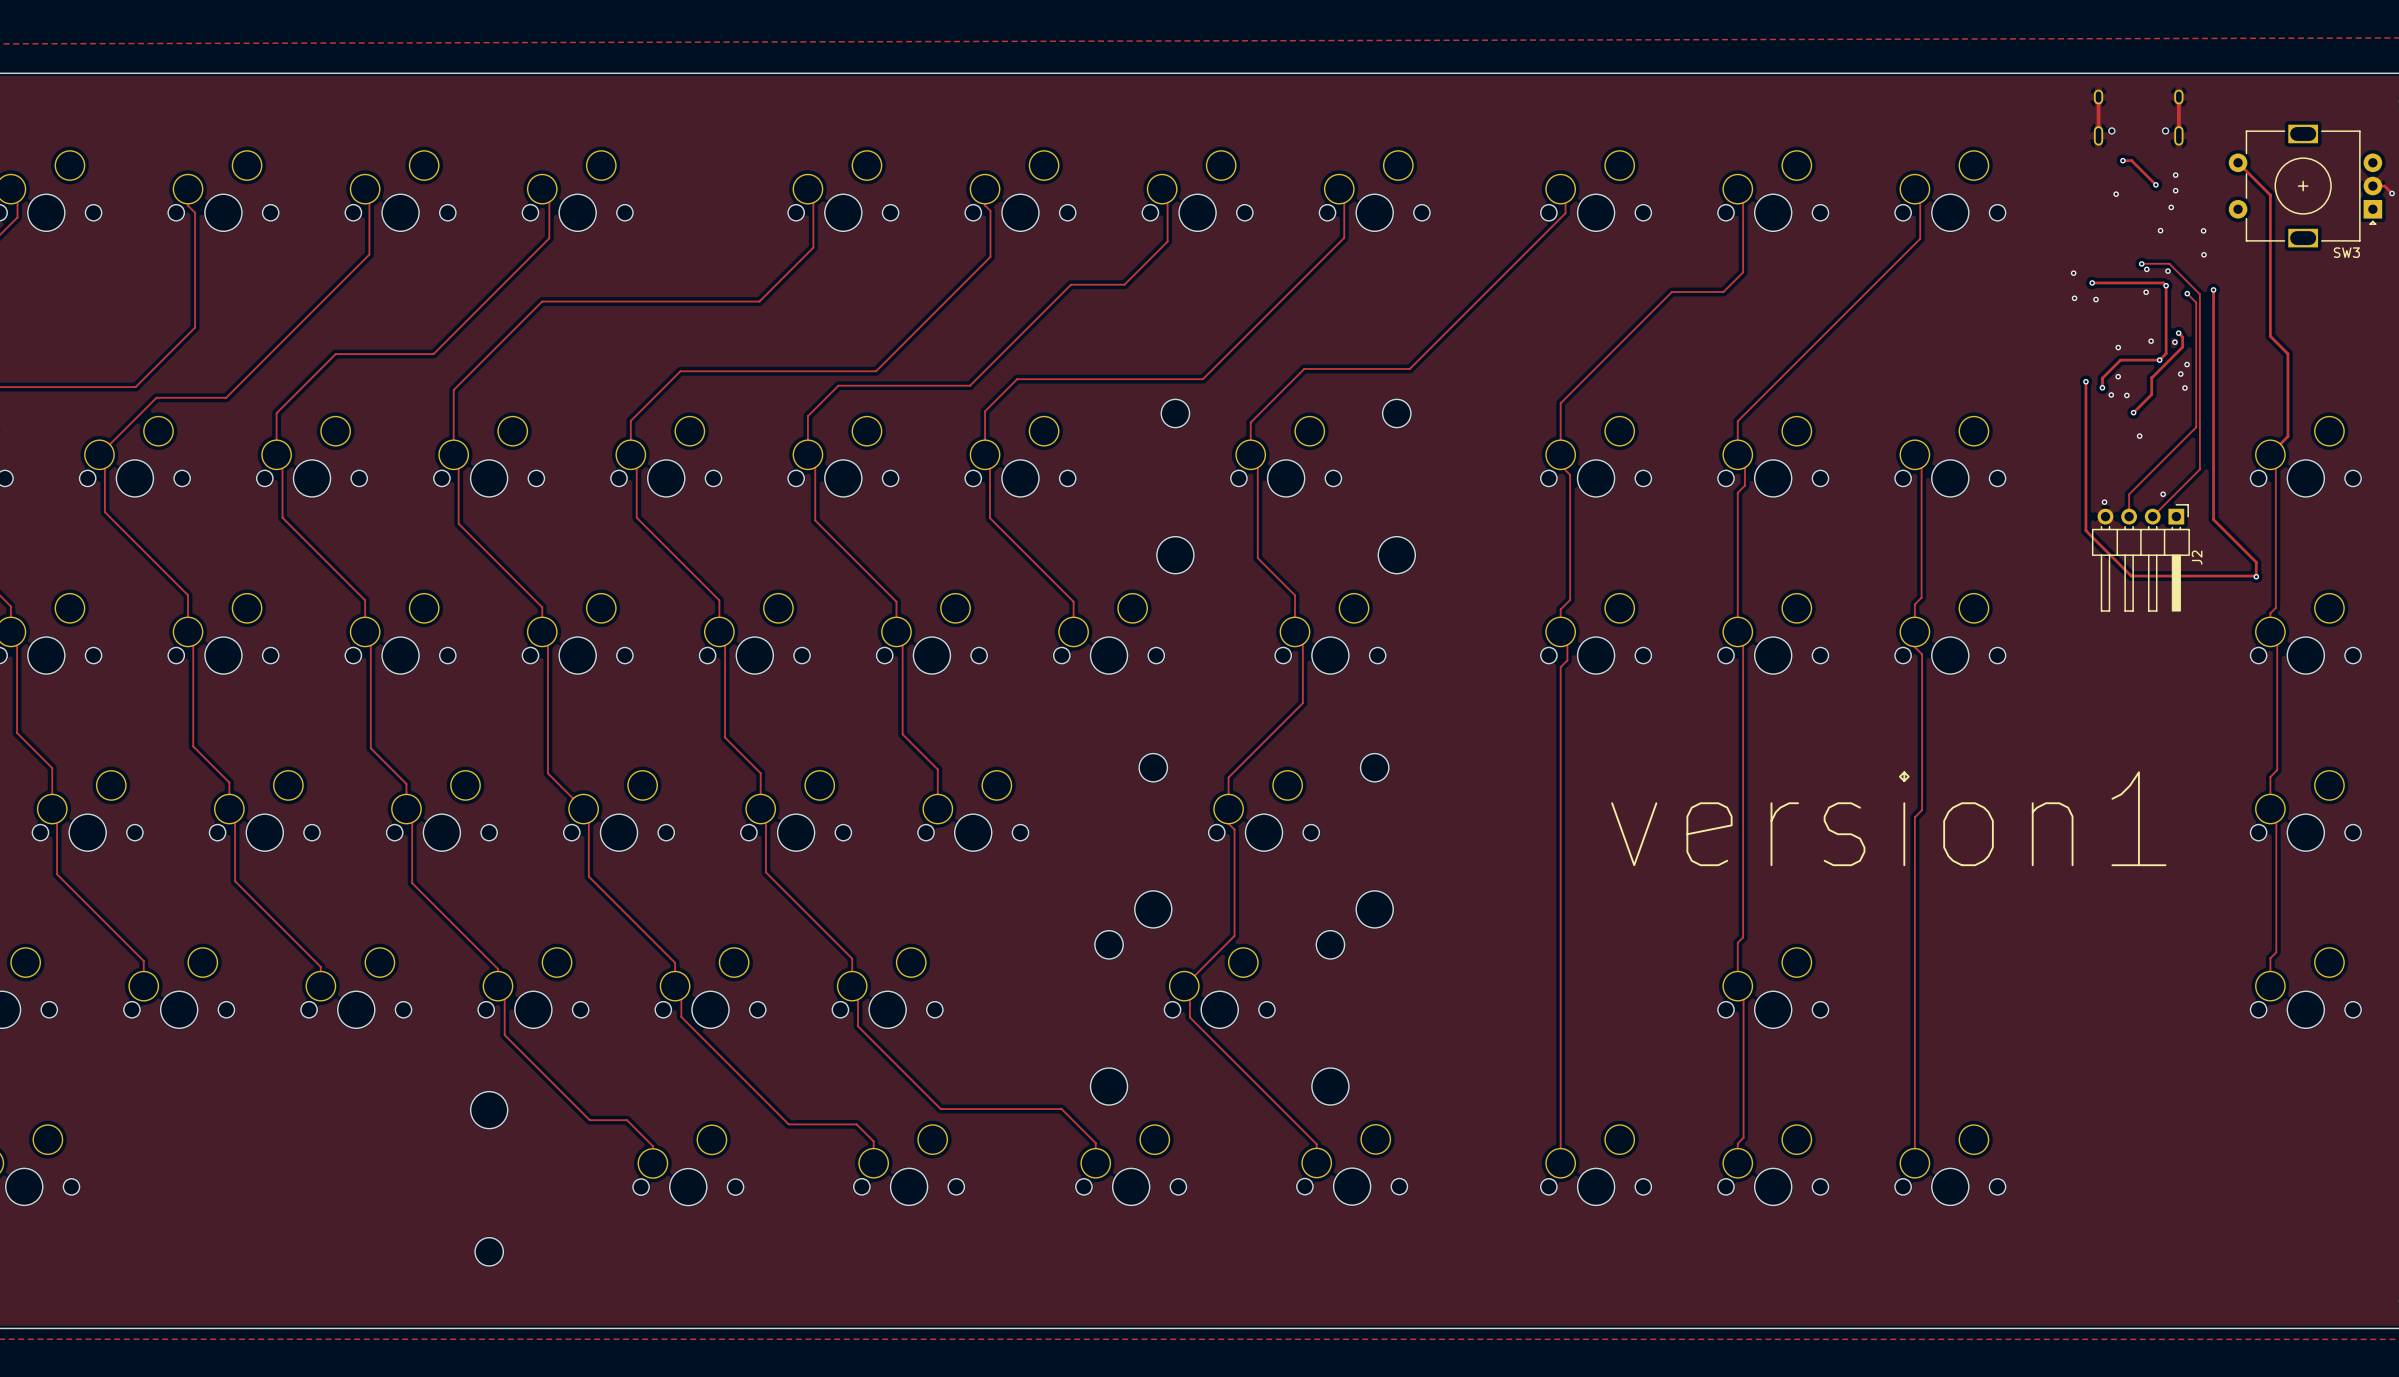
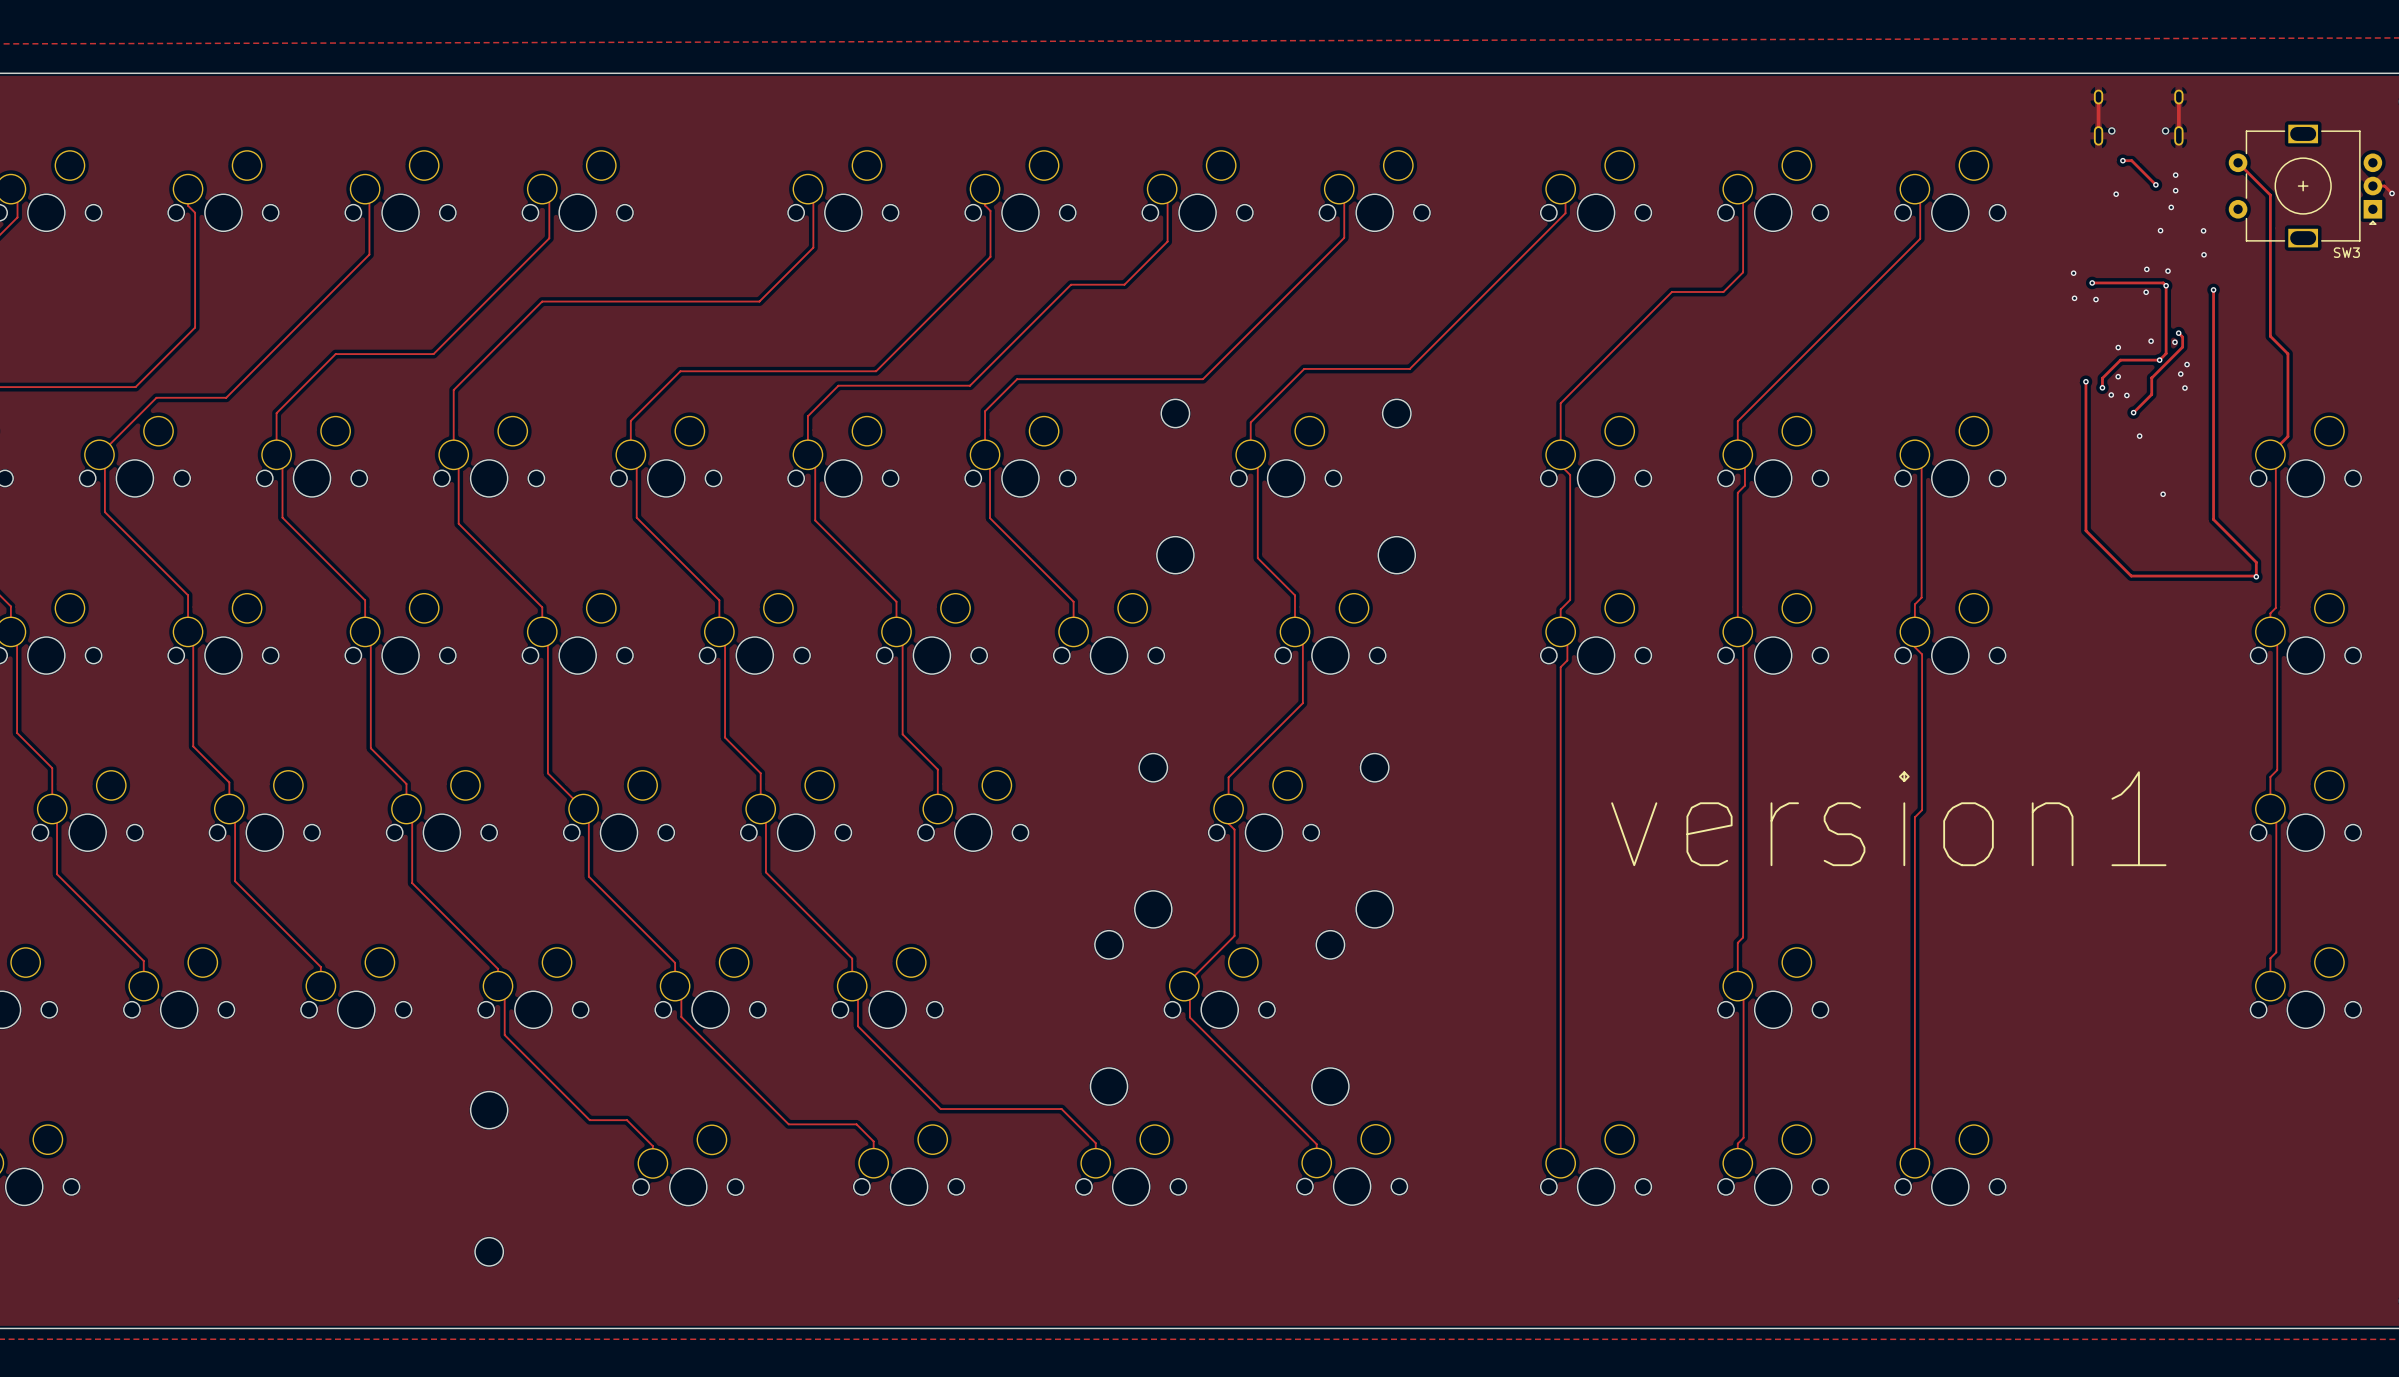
track: (2141, 263) (2169, 263) (2199, 294) (2199, 469) (2152, 516) -> none
via: (2141, 263) -> none
track: (2187, 293) (2196, 302) (2196, 427) (2129, 494) (2129, 516) -> none
via: (2187, 293) -> none
via: (2104, 502) -> none
J2: (2140, 557) -> none

